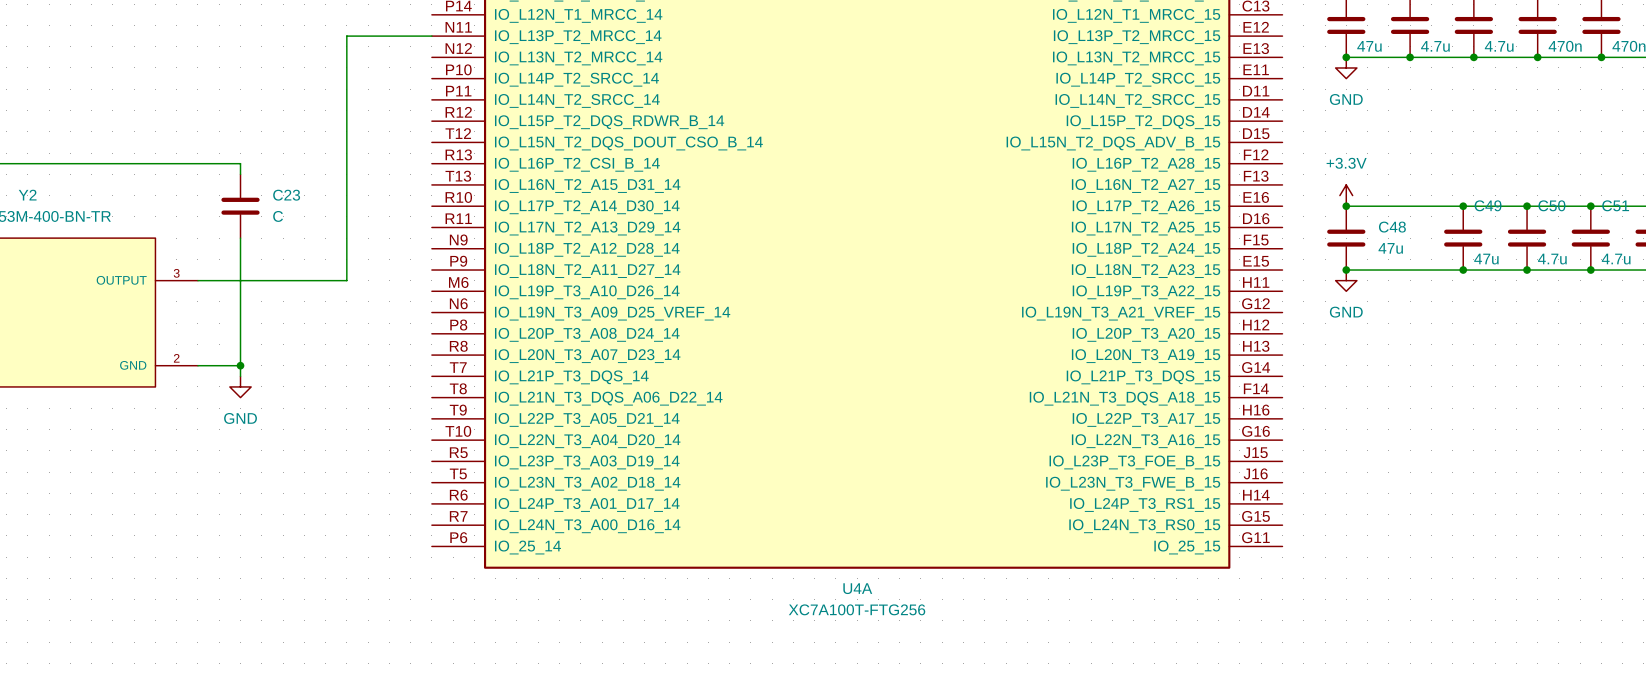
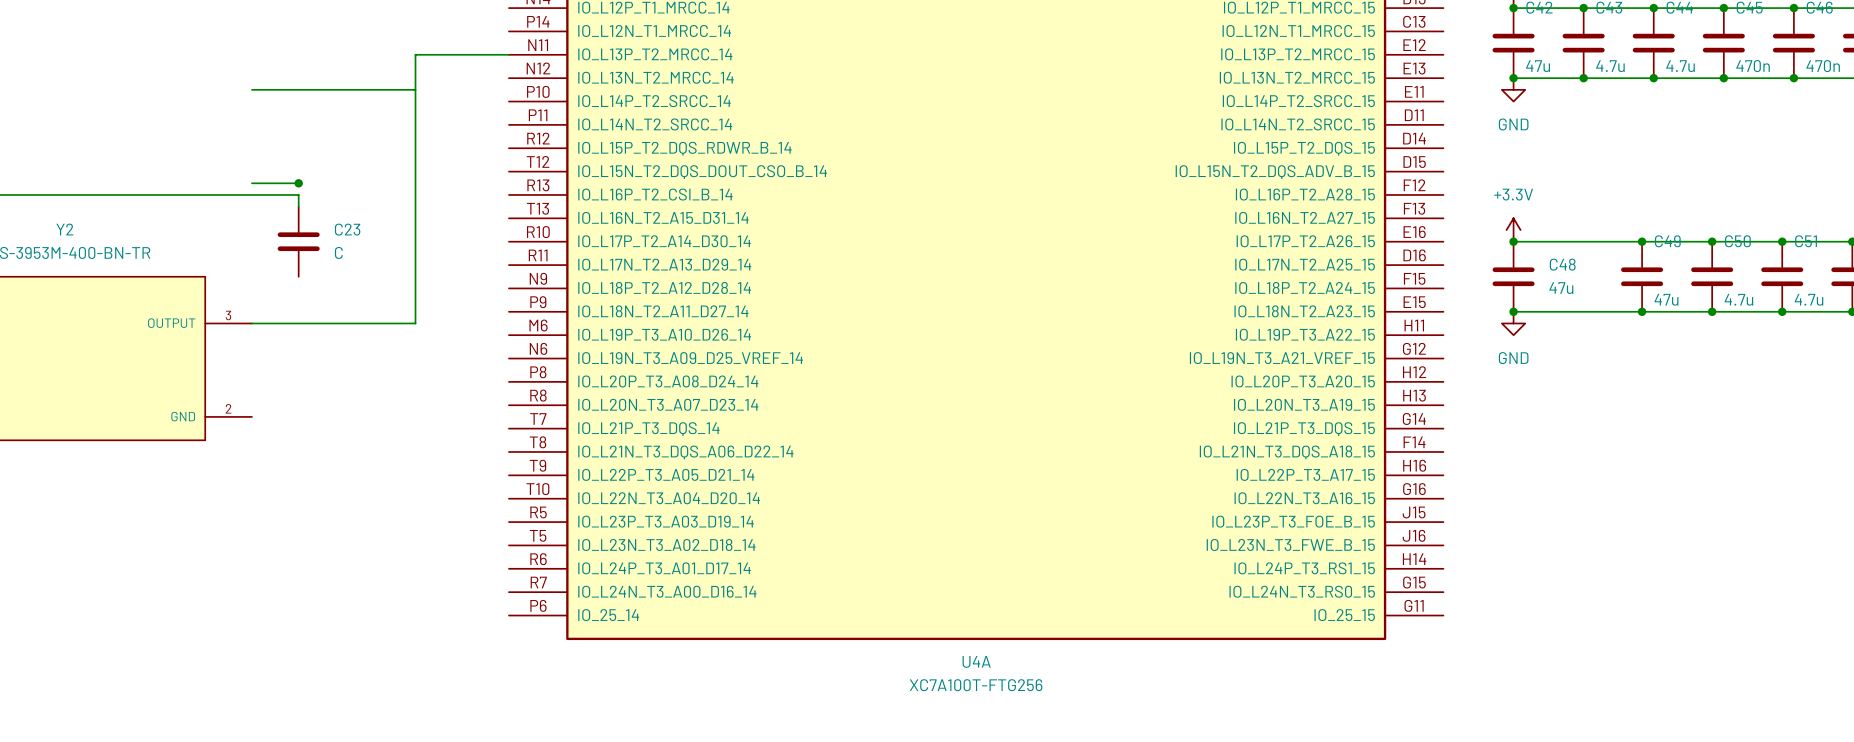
wire: none -> (251, 89) (415, 89)
wire: none -> (251, 183) (298, 183)
junction: none -> (298, 183)
wire: (240, 238) (240, 376) -> none
wire: (197, 365) (240, 365) -> none
junction: (240, 365) -> none
power symbol: GND (240, 386) -> none

